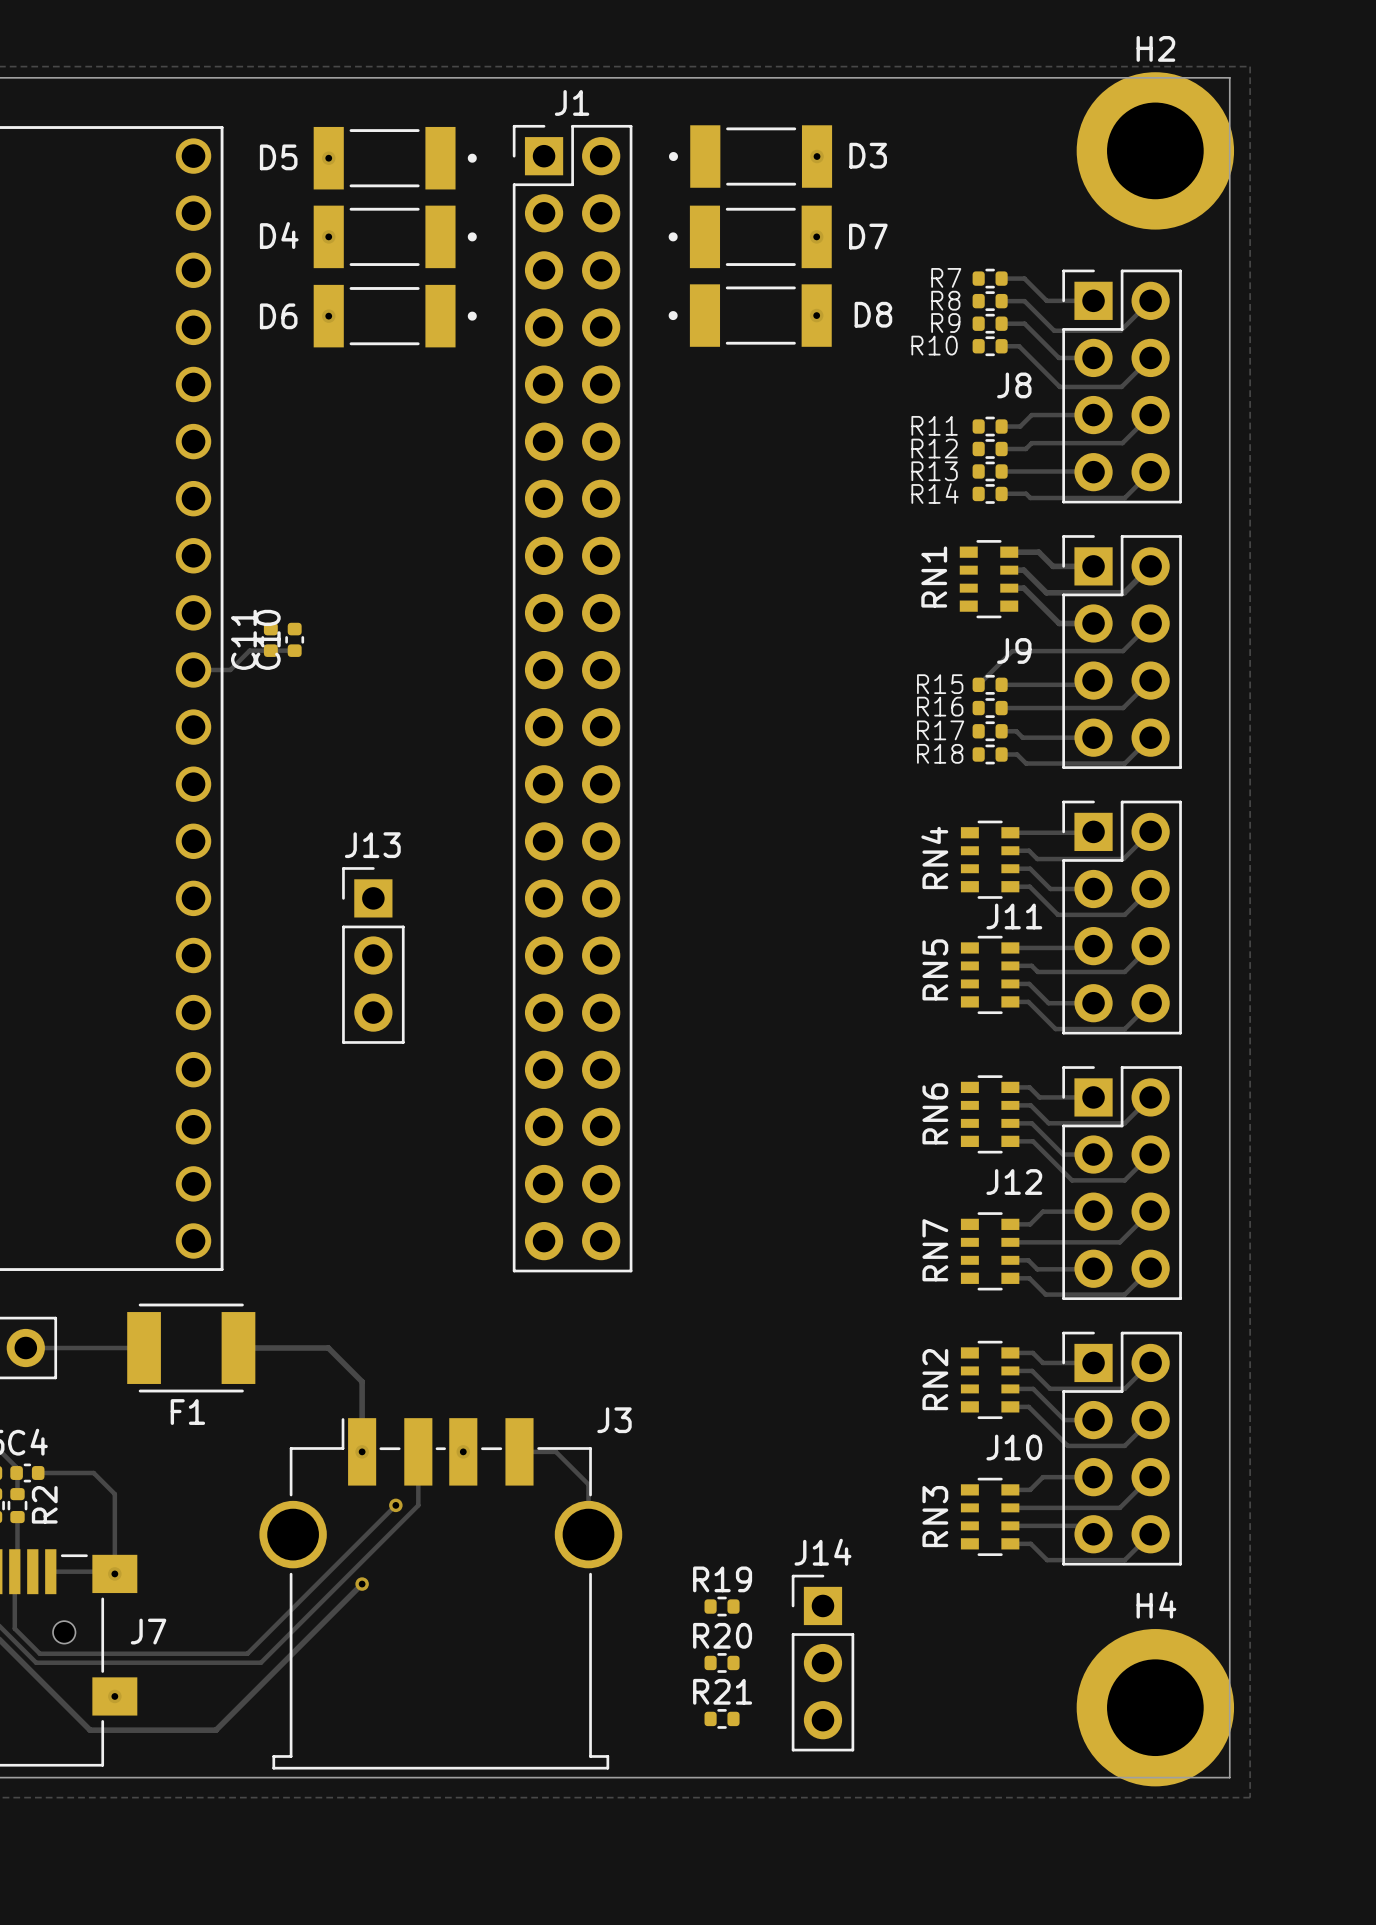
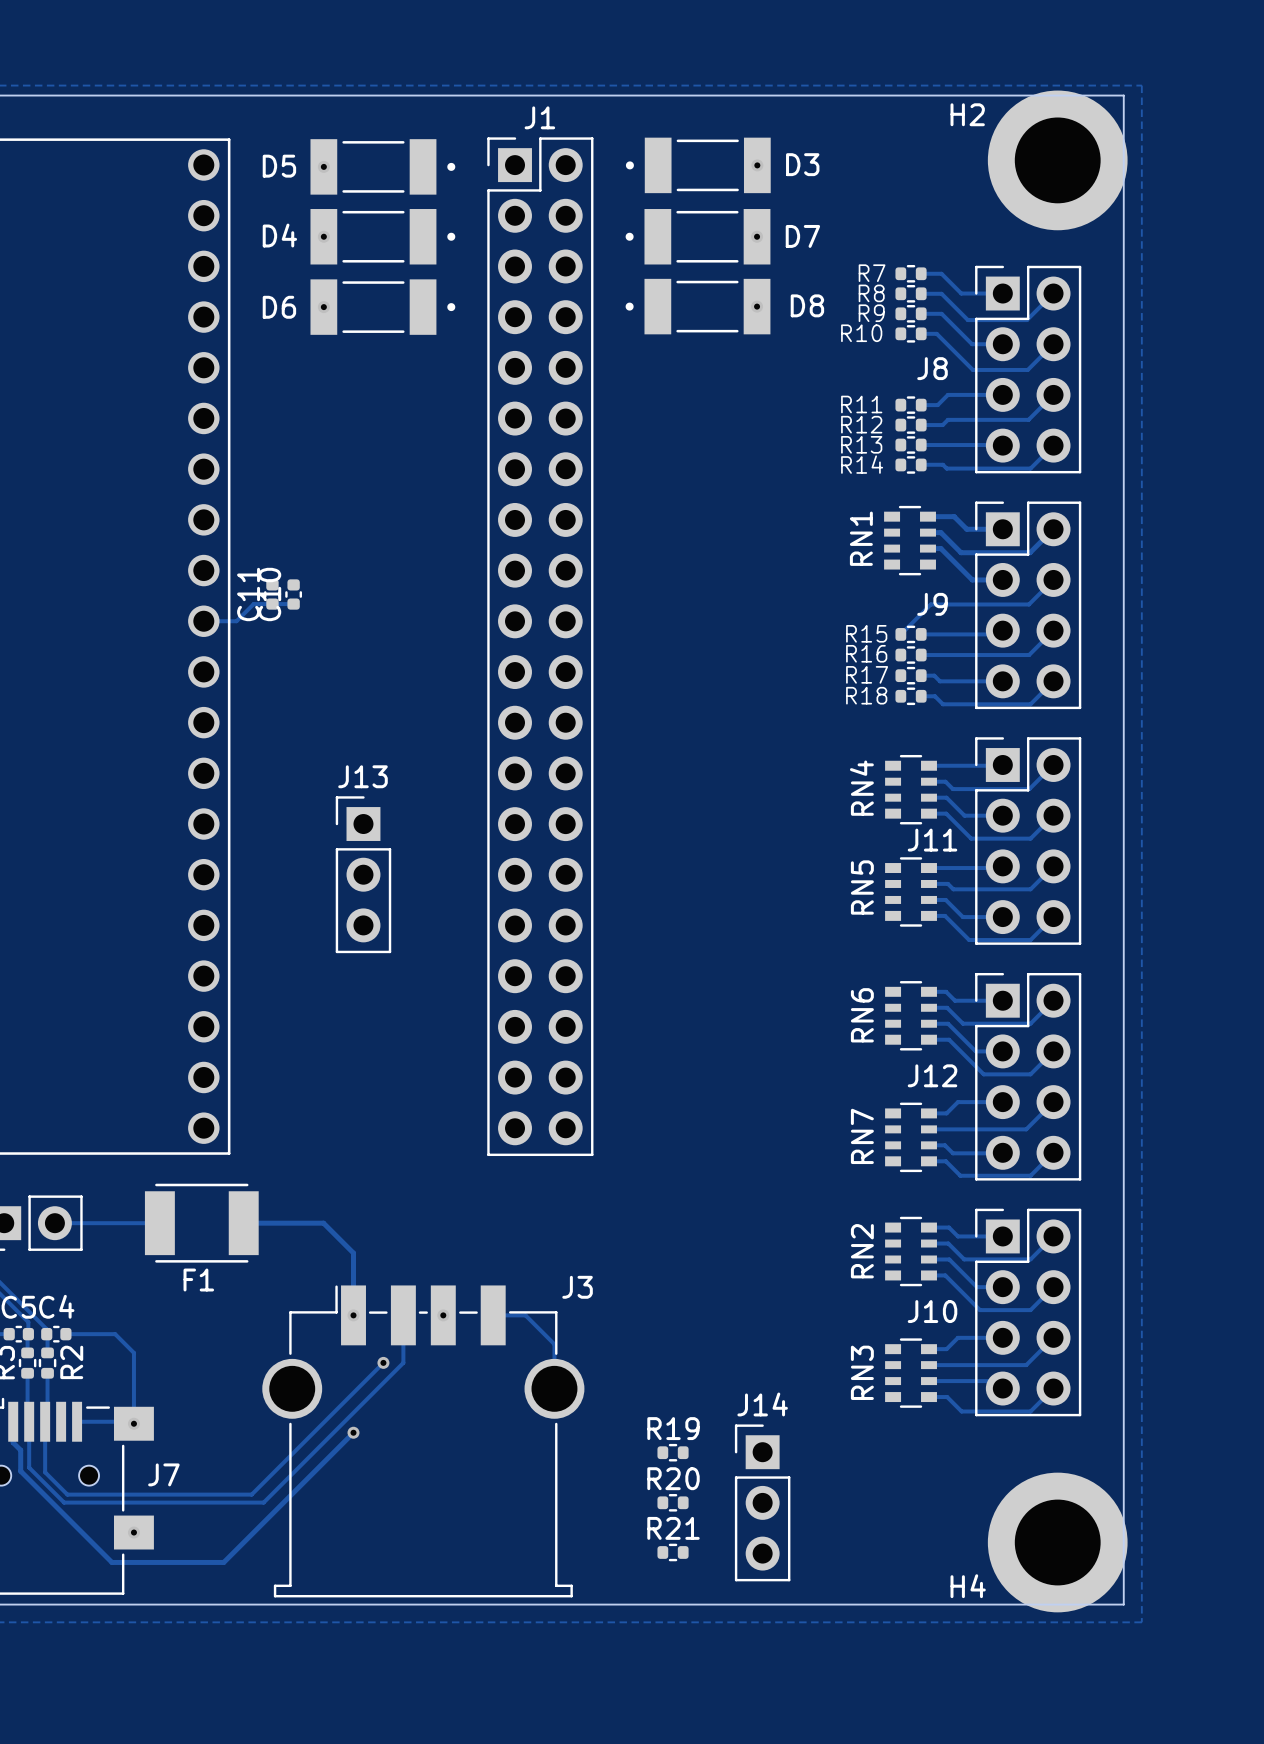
H2 name position: H2 (1155, 48) -> H2 (967, 114)
H4 name position: H4 (1156, 1605) -> H4 (968, 1586)

